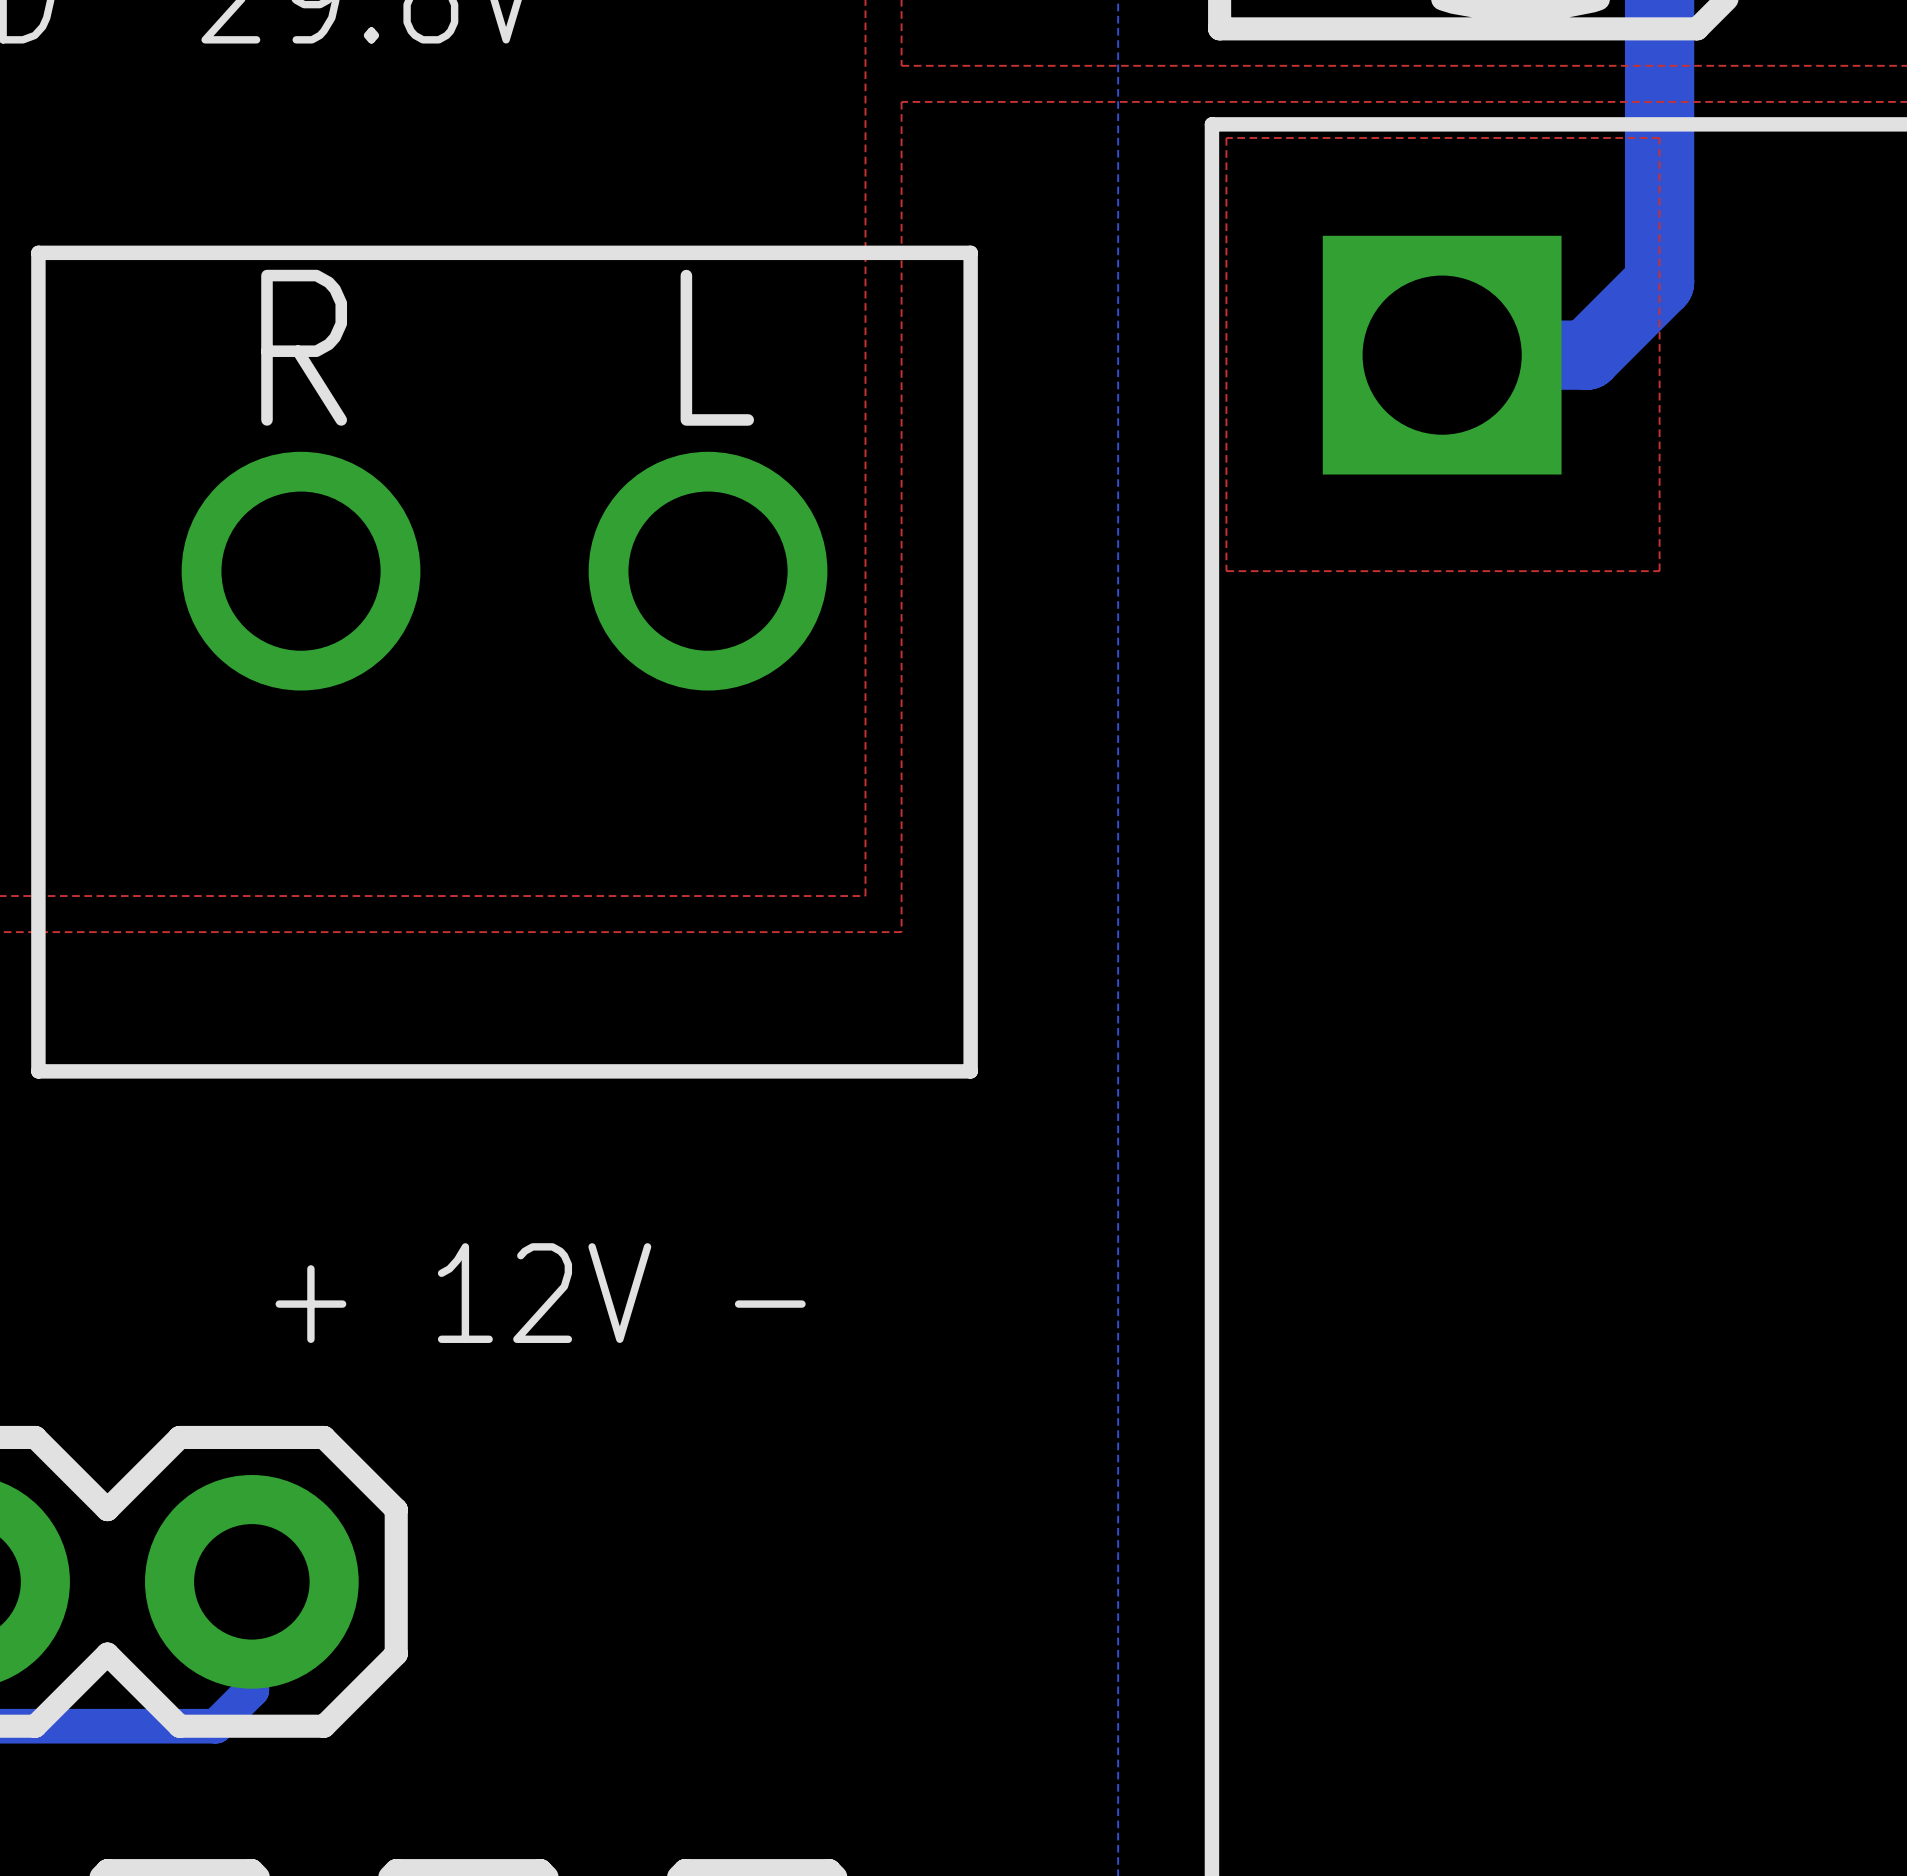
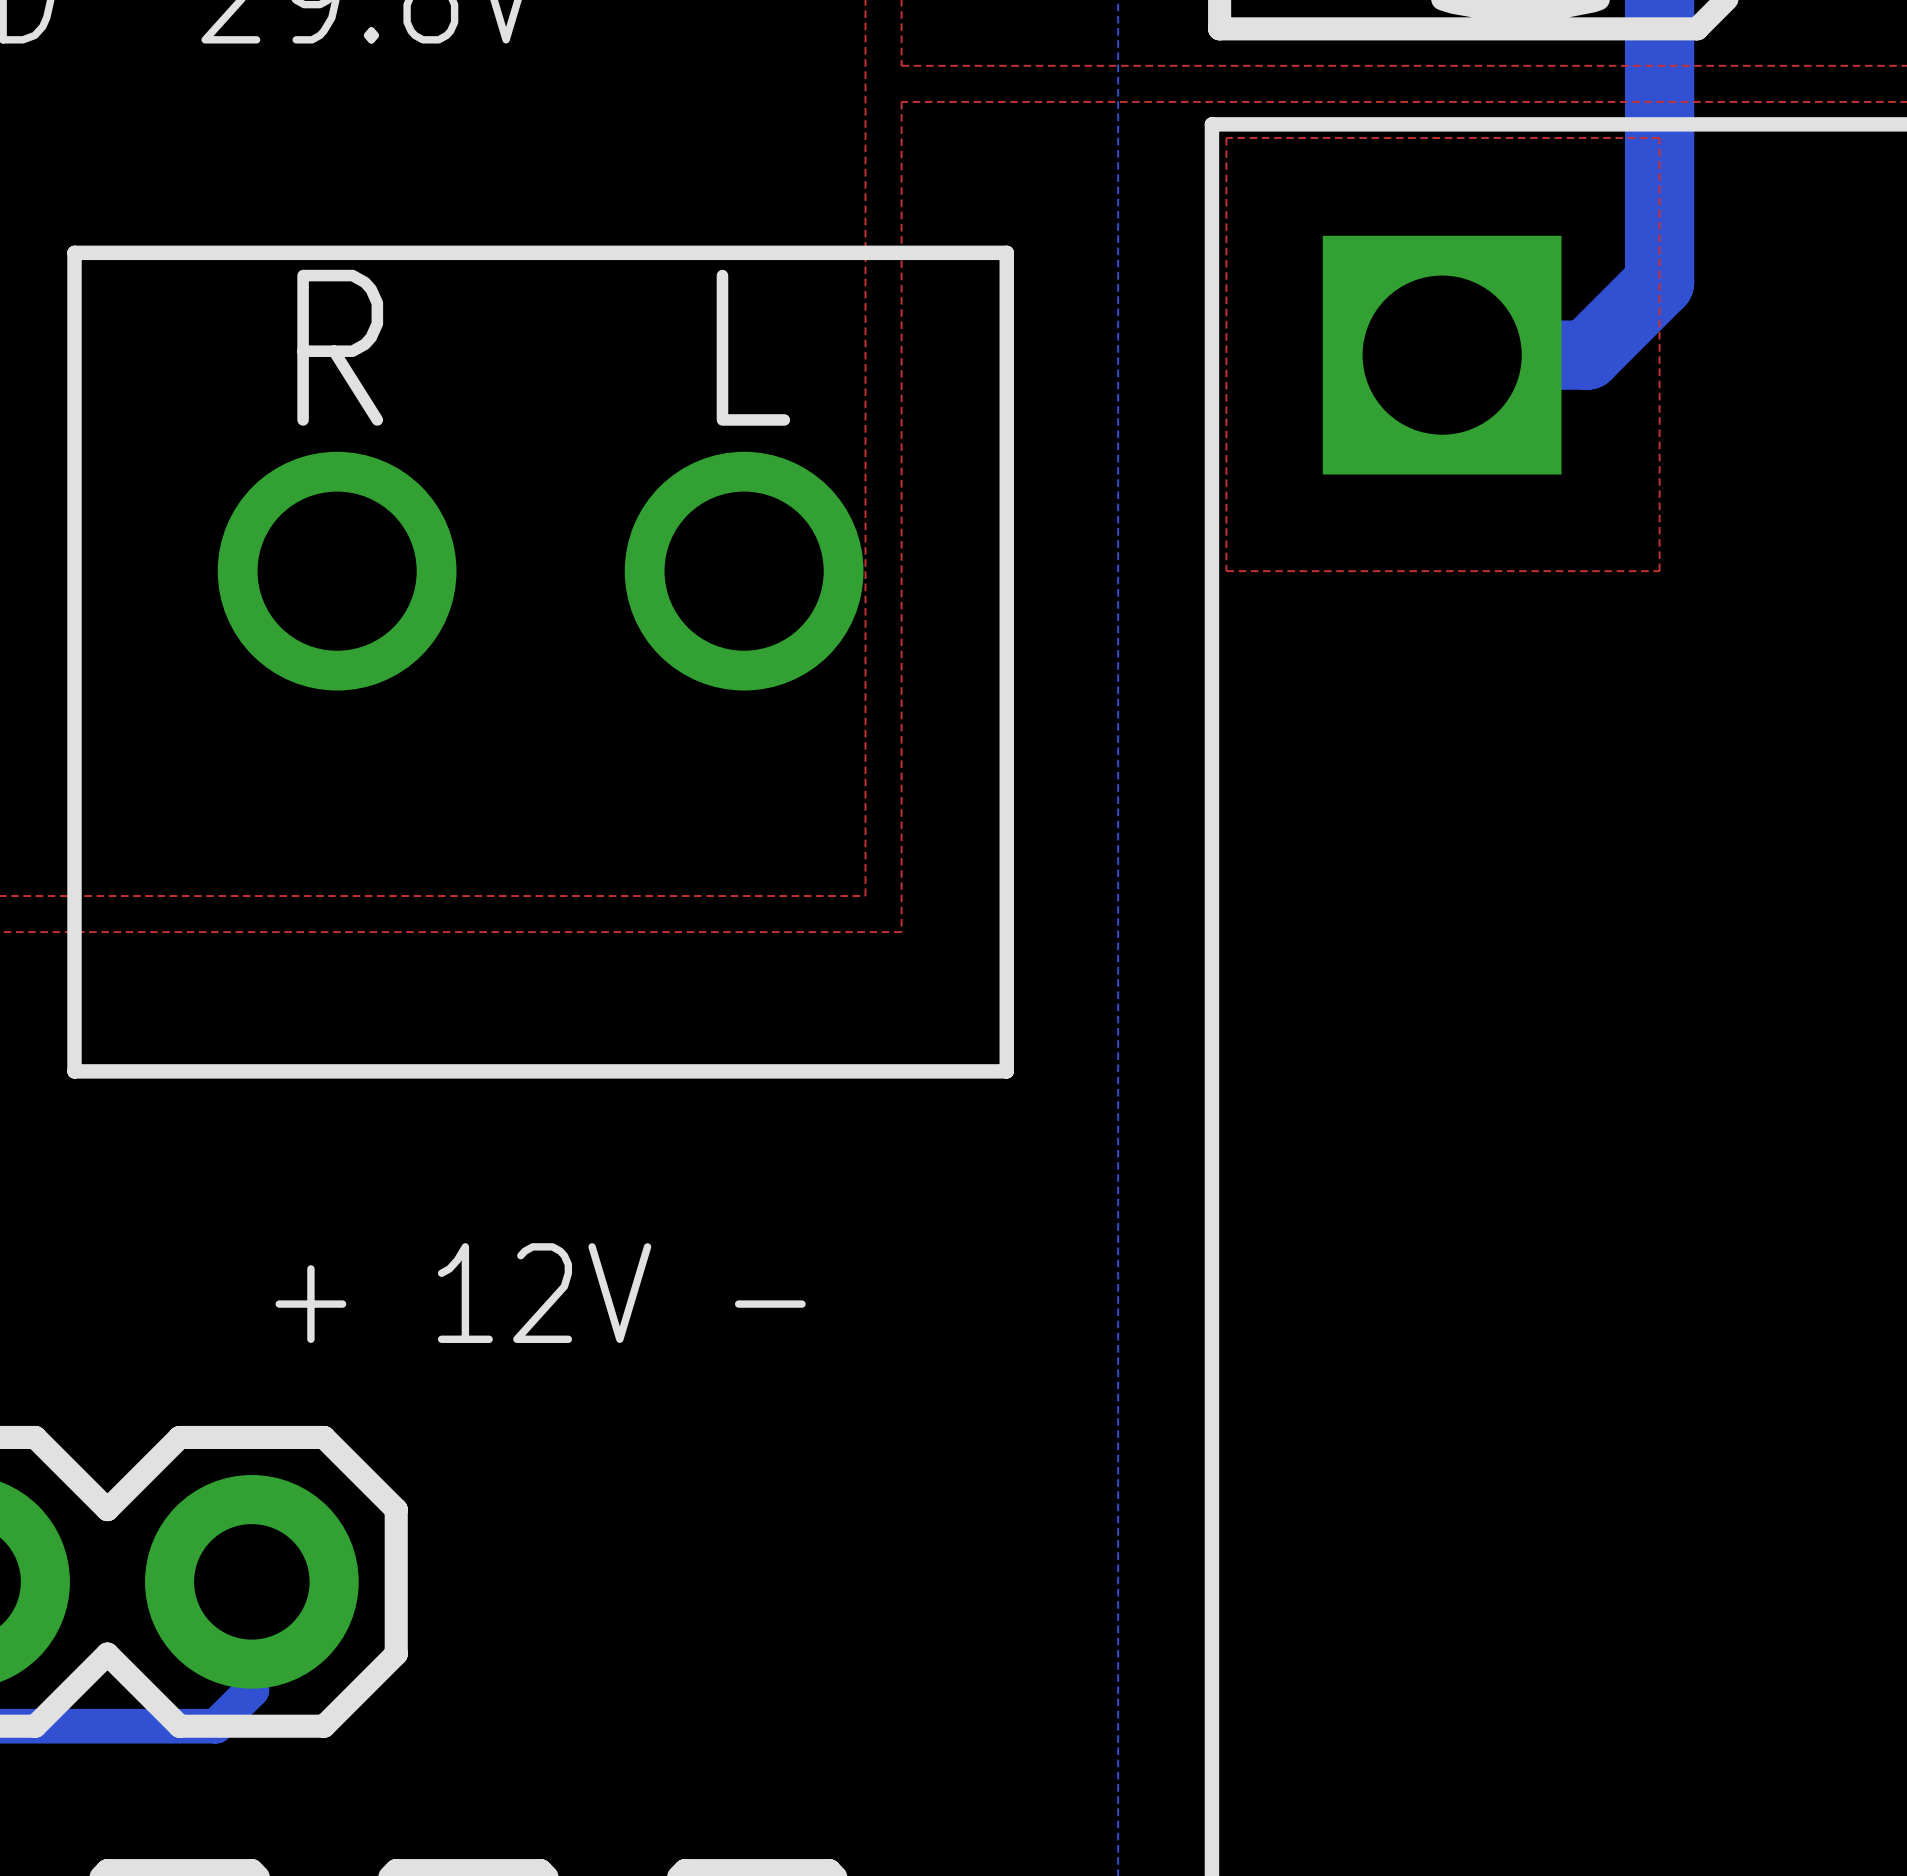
part position: (504, 662) -> (540, 662)

